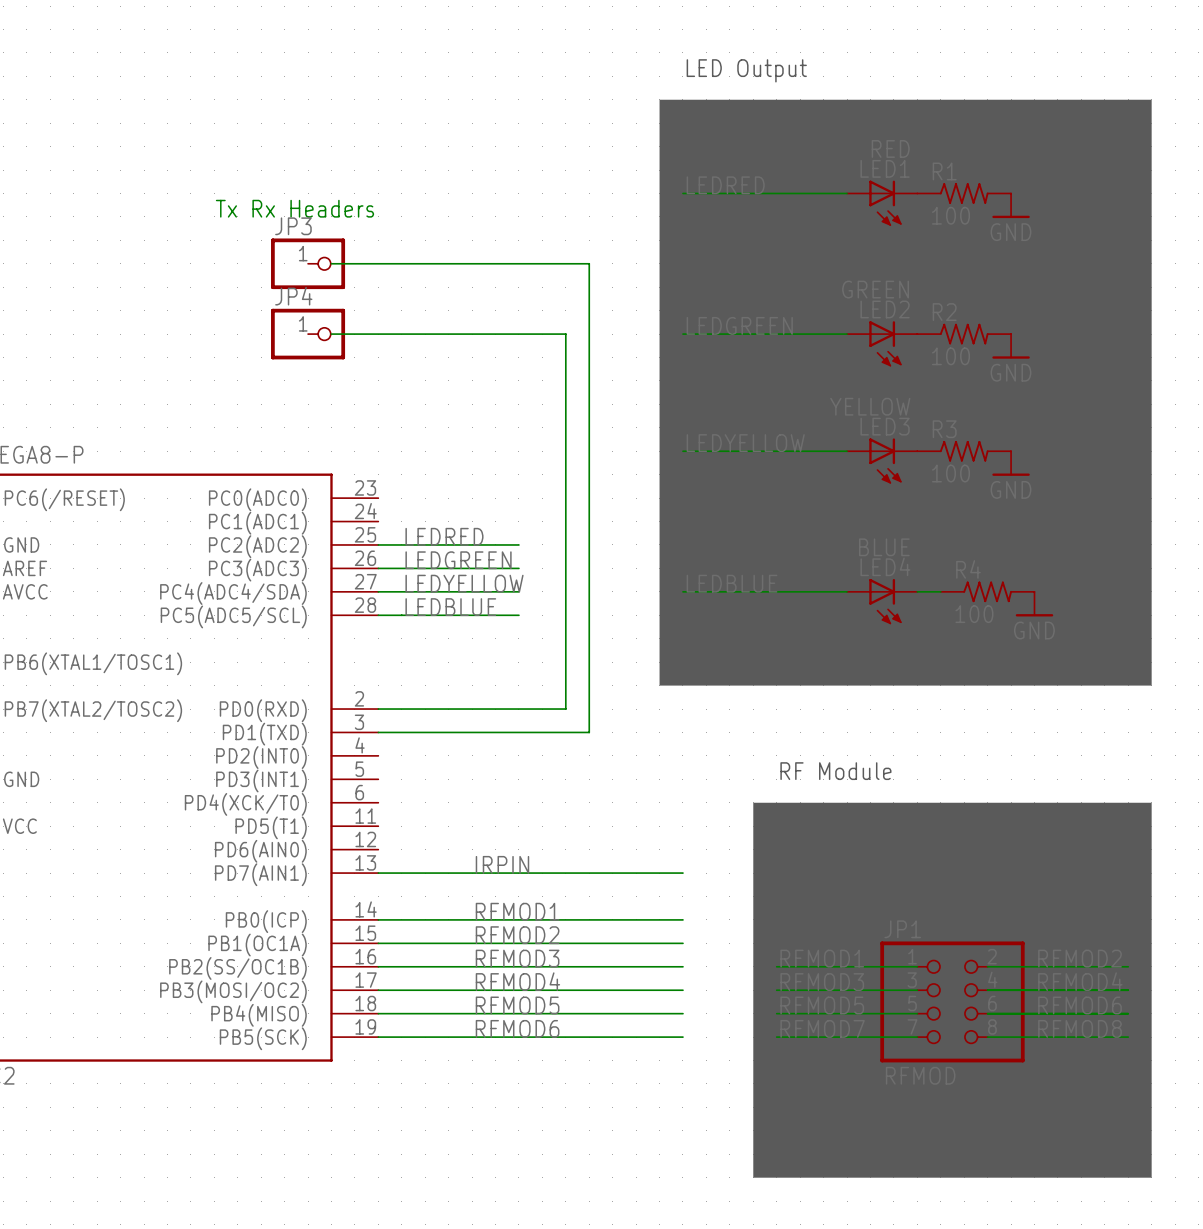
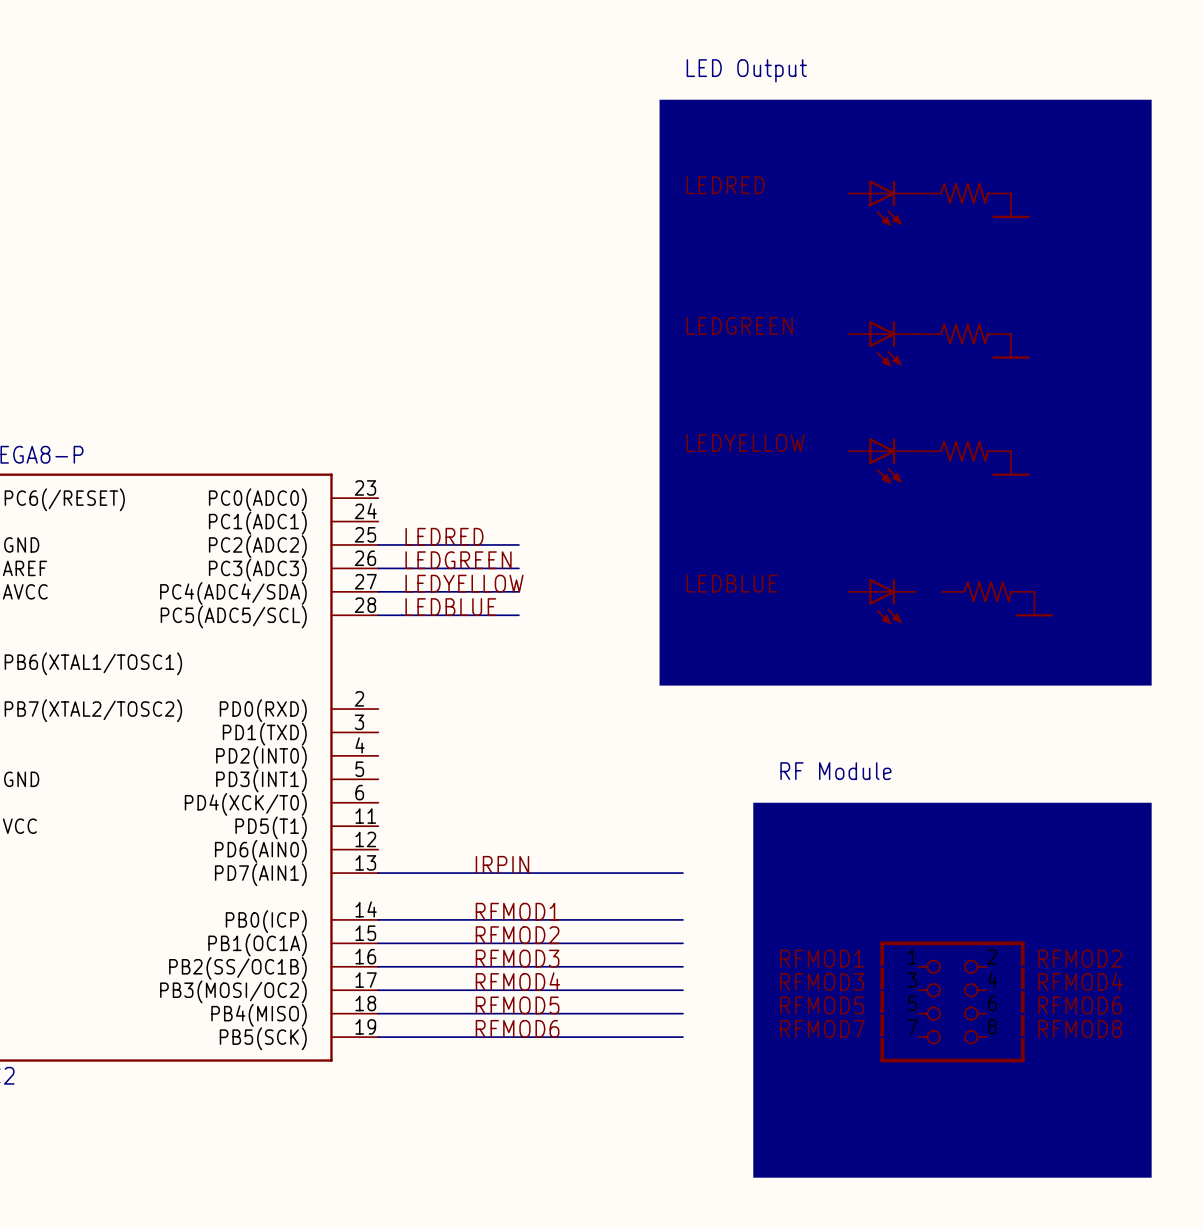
text: Tx Rx Headers (294, 208) -> none
JP3: (308, 263) -> none
wire: (331, 263) (589, 263) (589, 732) (378, 732) -> none
JP4: (308, 334) -> none
wire: (331, 334) (565, 334) (565, 709) (378, 709) -> none

